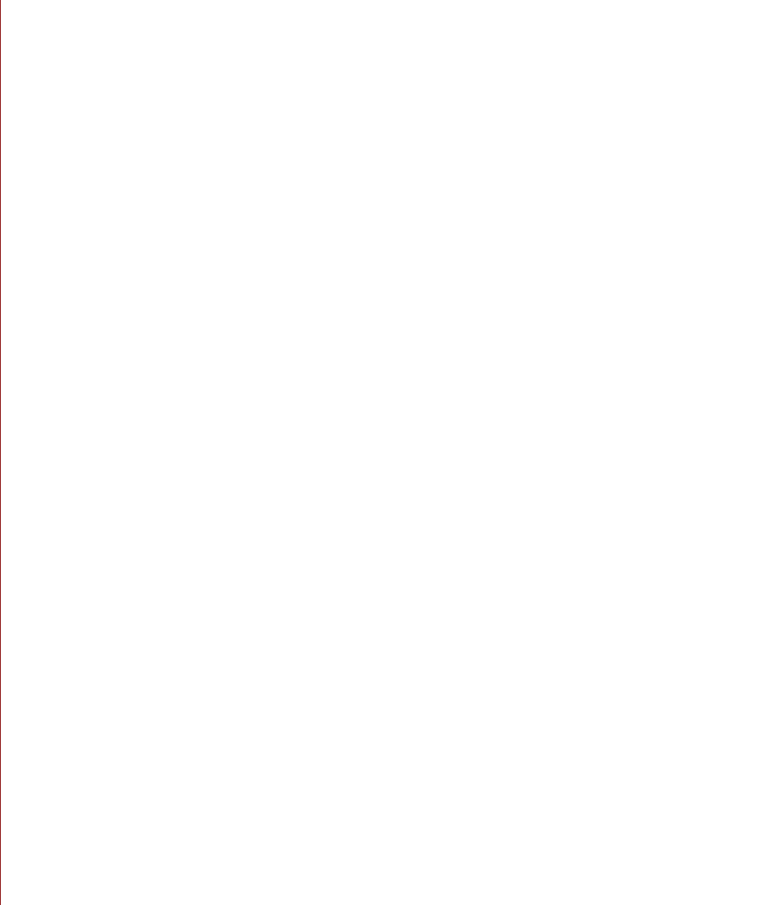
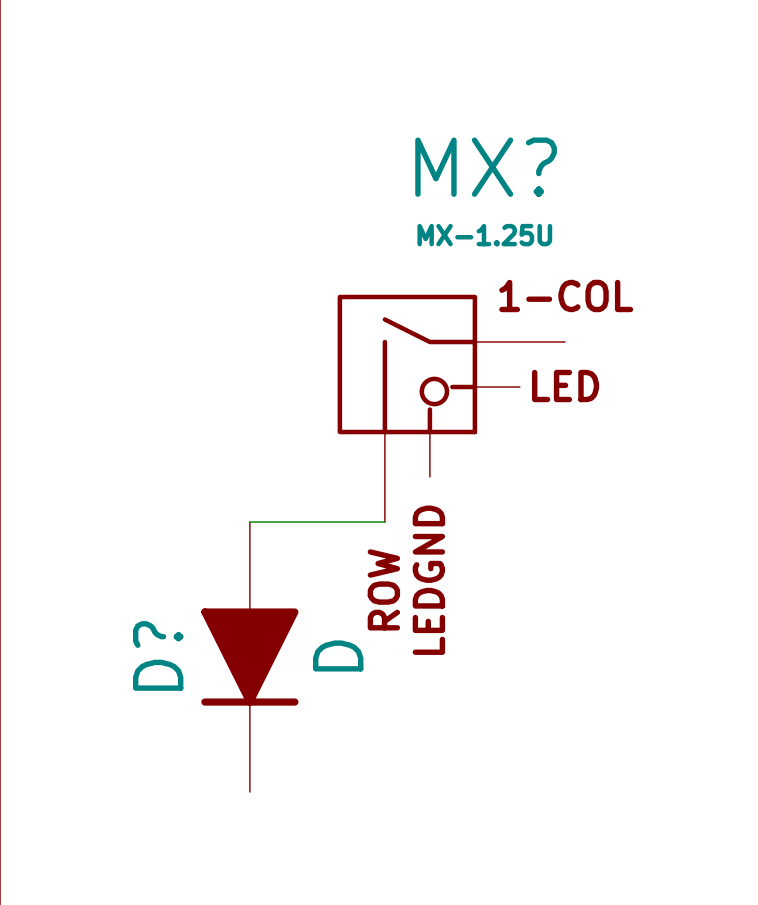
MX?: none -> MX-1.25U (451, 408)
wire: none -> (249, 522) (384, 522)
D?: none -> D (249, 657)

